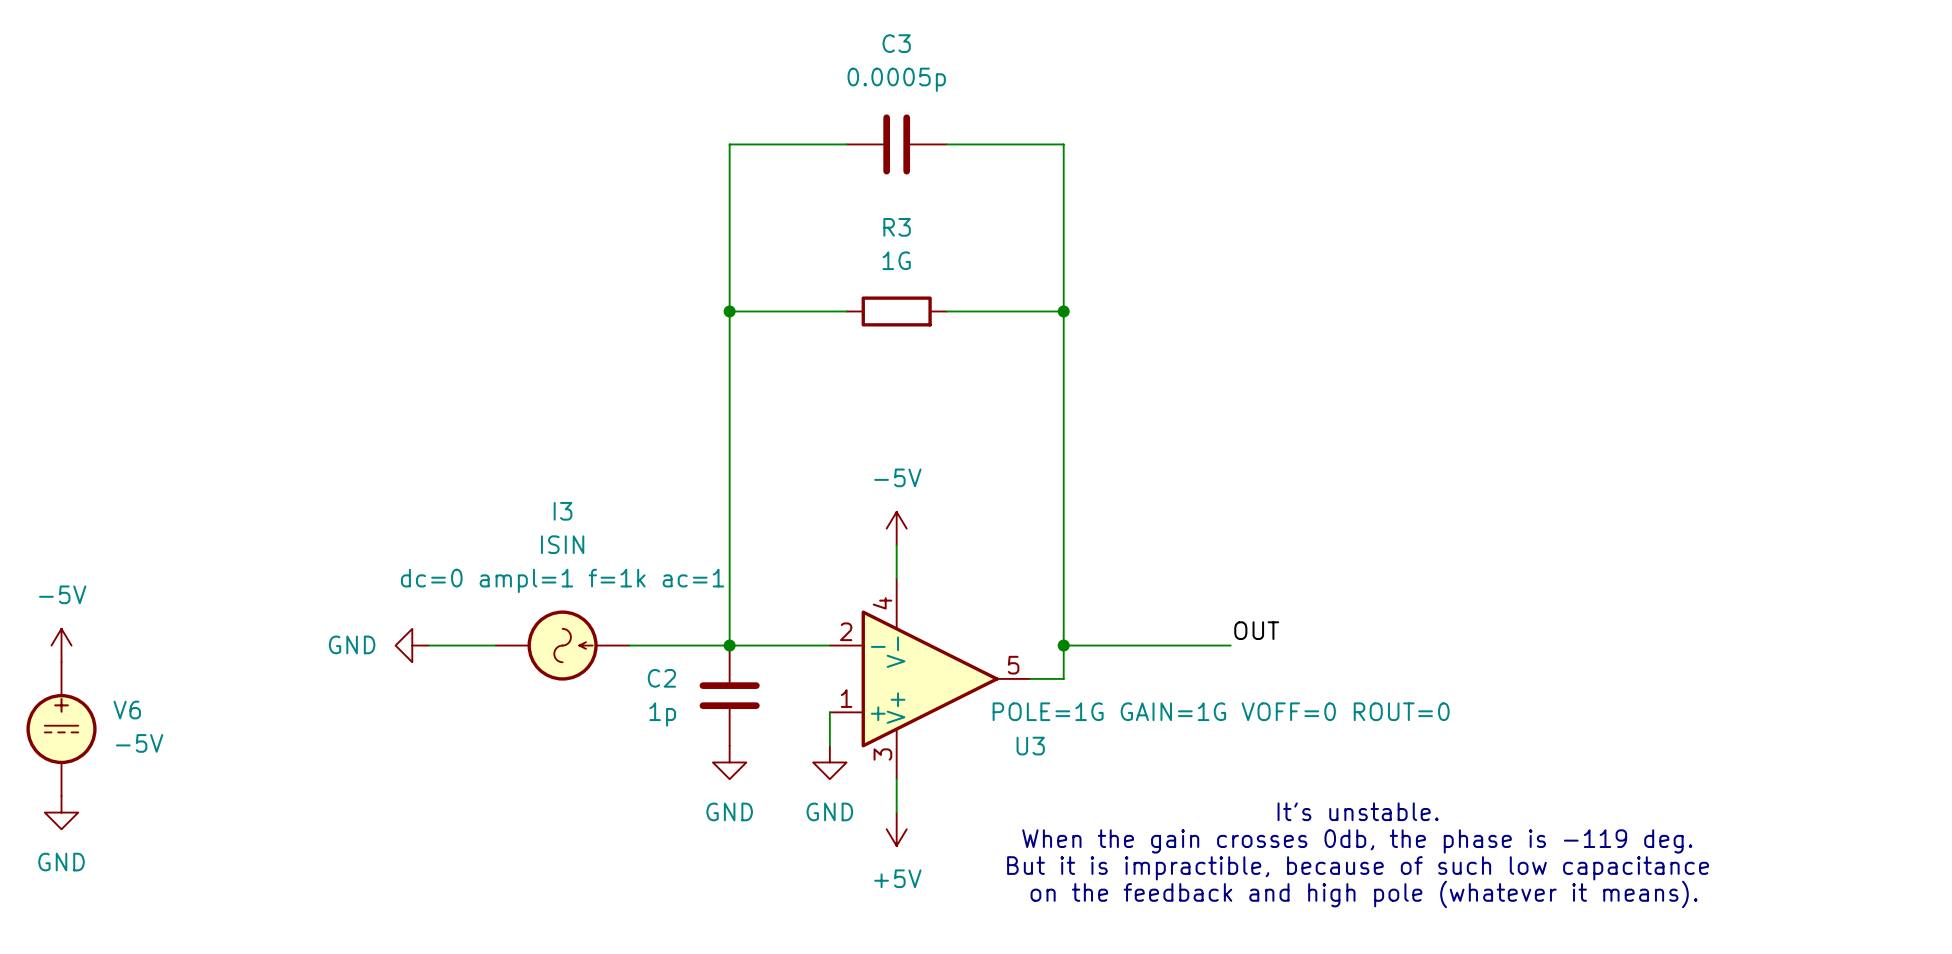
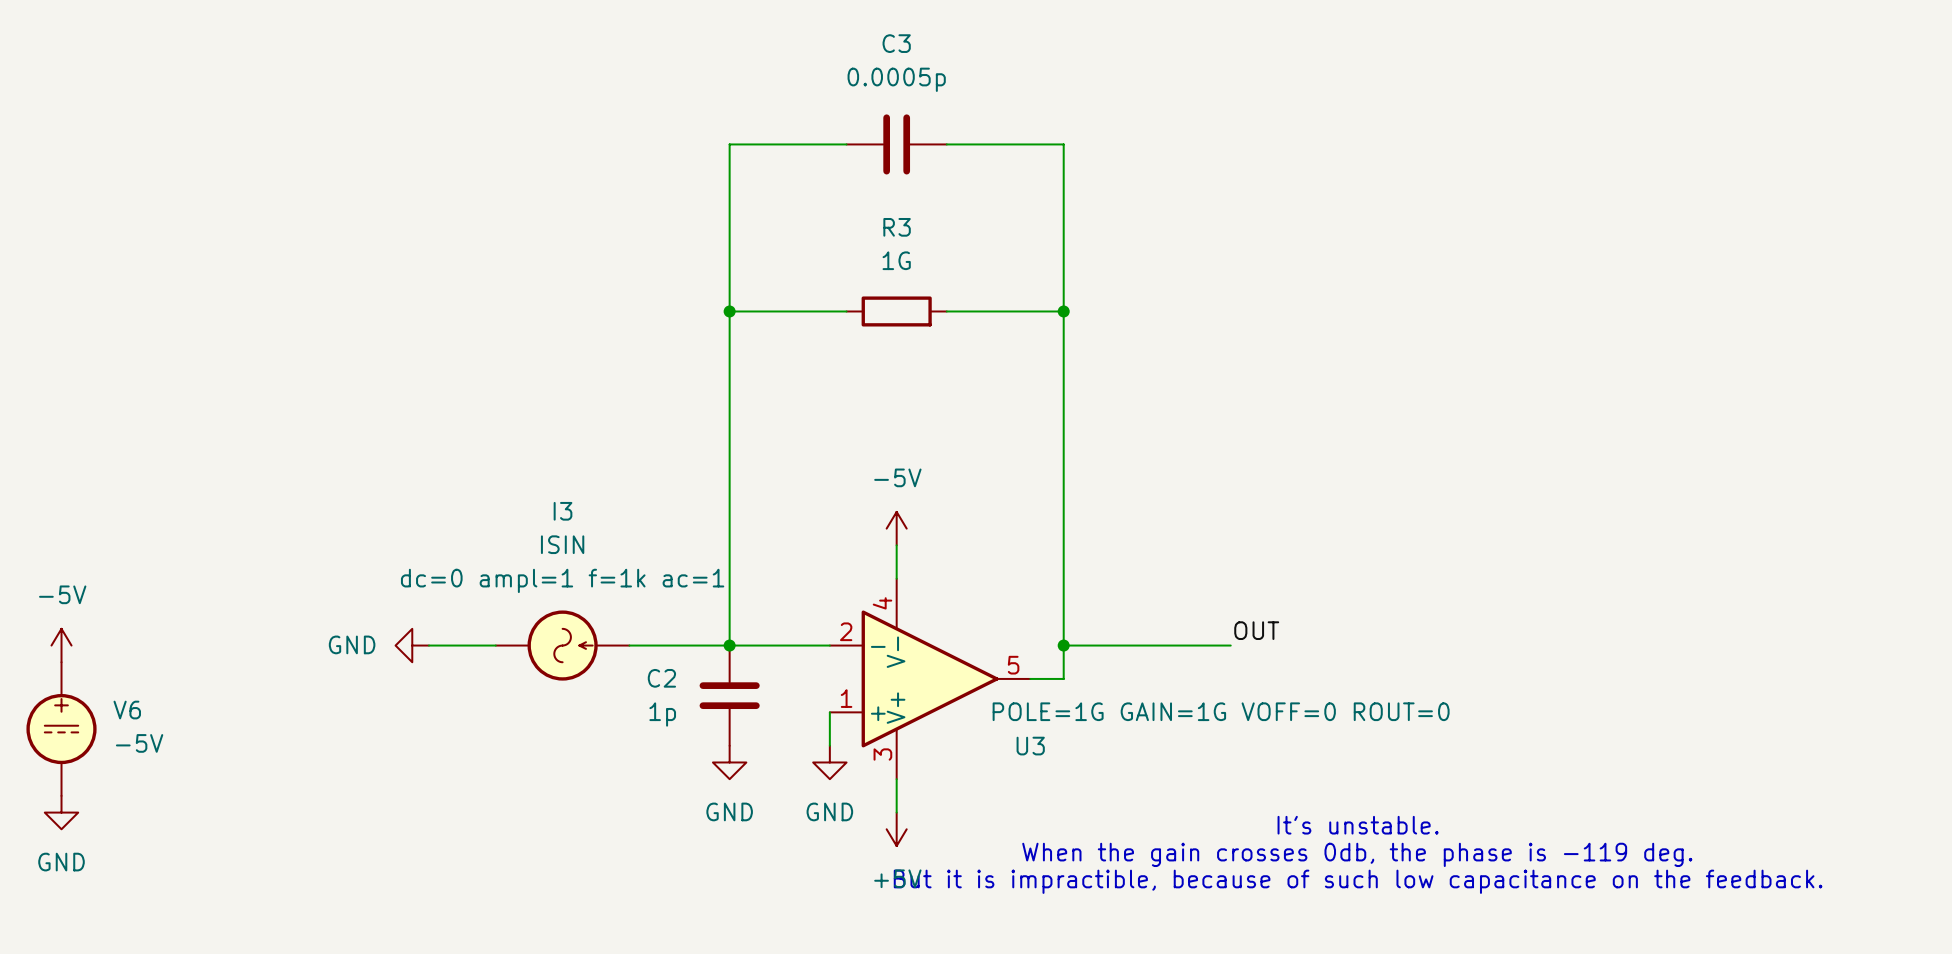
text position: It's unstable. (1358, 811) -> It's unstable. (1358, 825)
text position: When the gain crosses 0db, the phase is -119 deg. (1357, 841) -> When the gain crosses 0db, the phase is -119 deg. (1357, 854)
text: But it is impractible, because of such low capacitance (1358, 868) -> But it is impractible, because of such low capacitance on the feedback. (1358, 881)
text: on the feedback and high pole (whatever it means). (1364, 894) -> none

